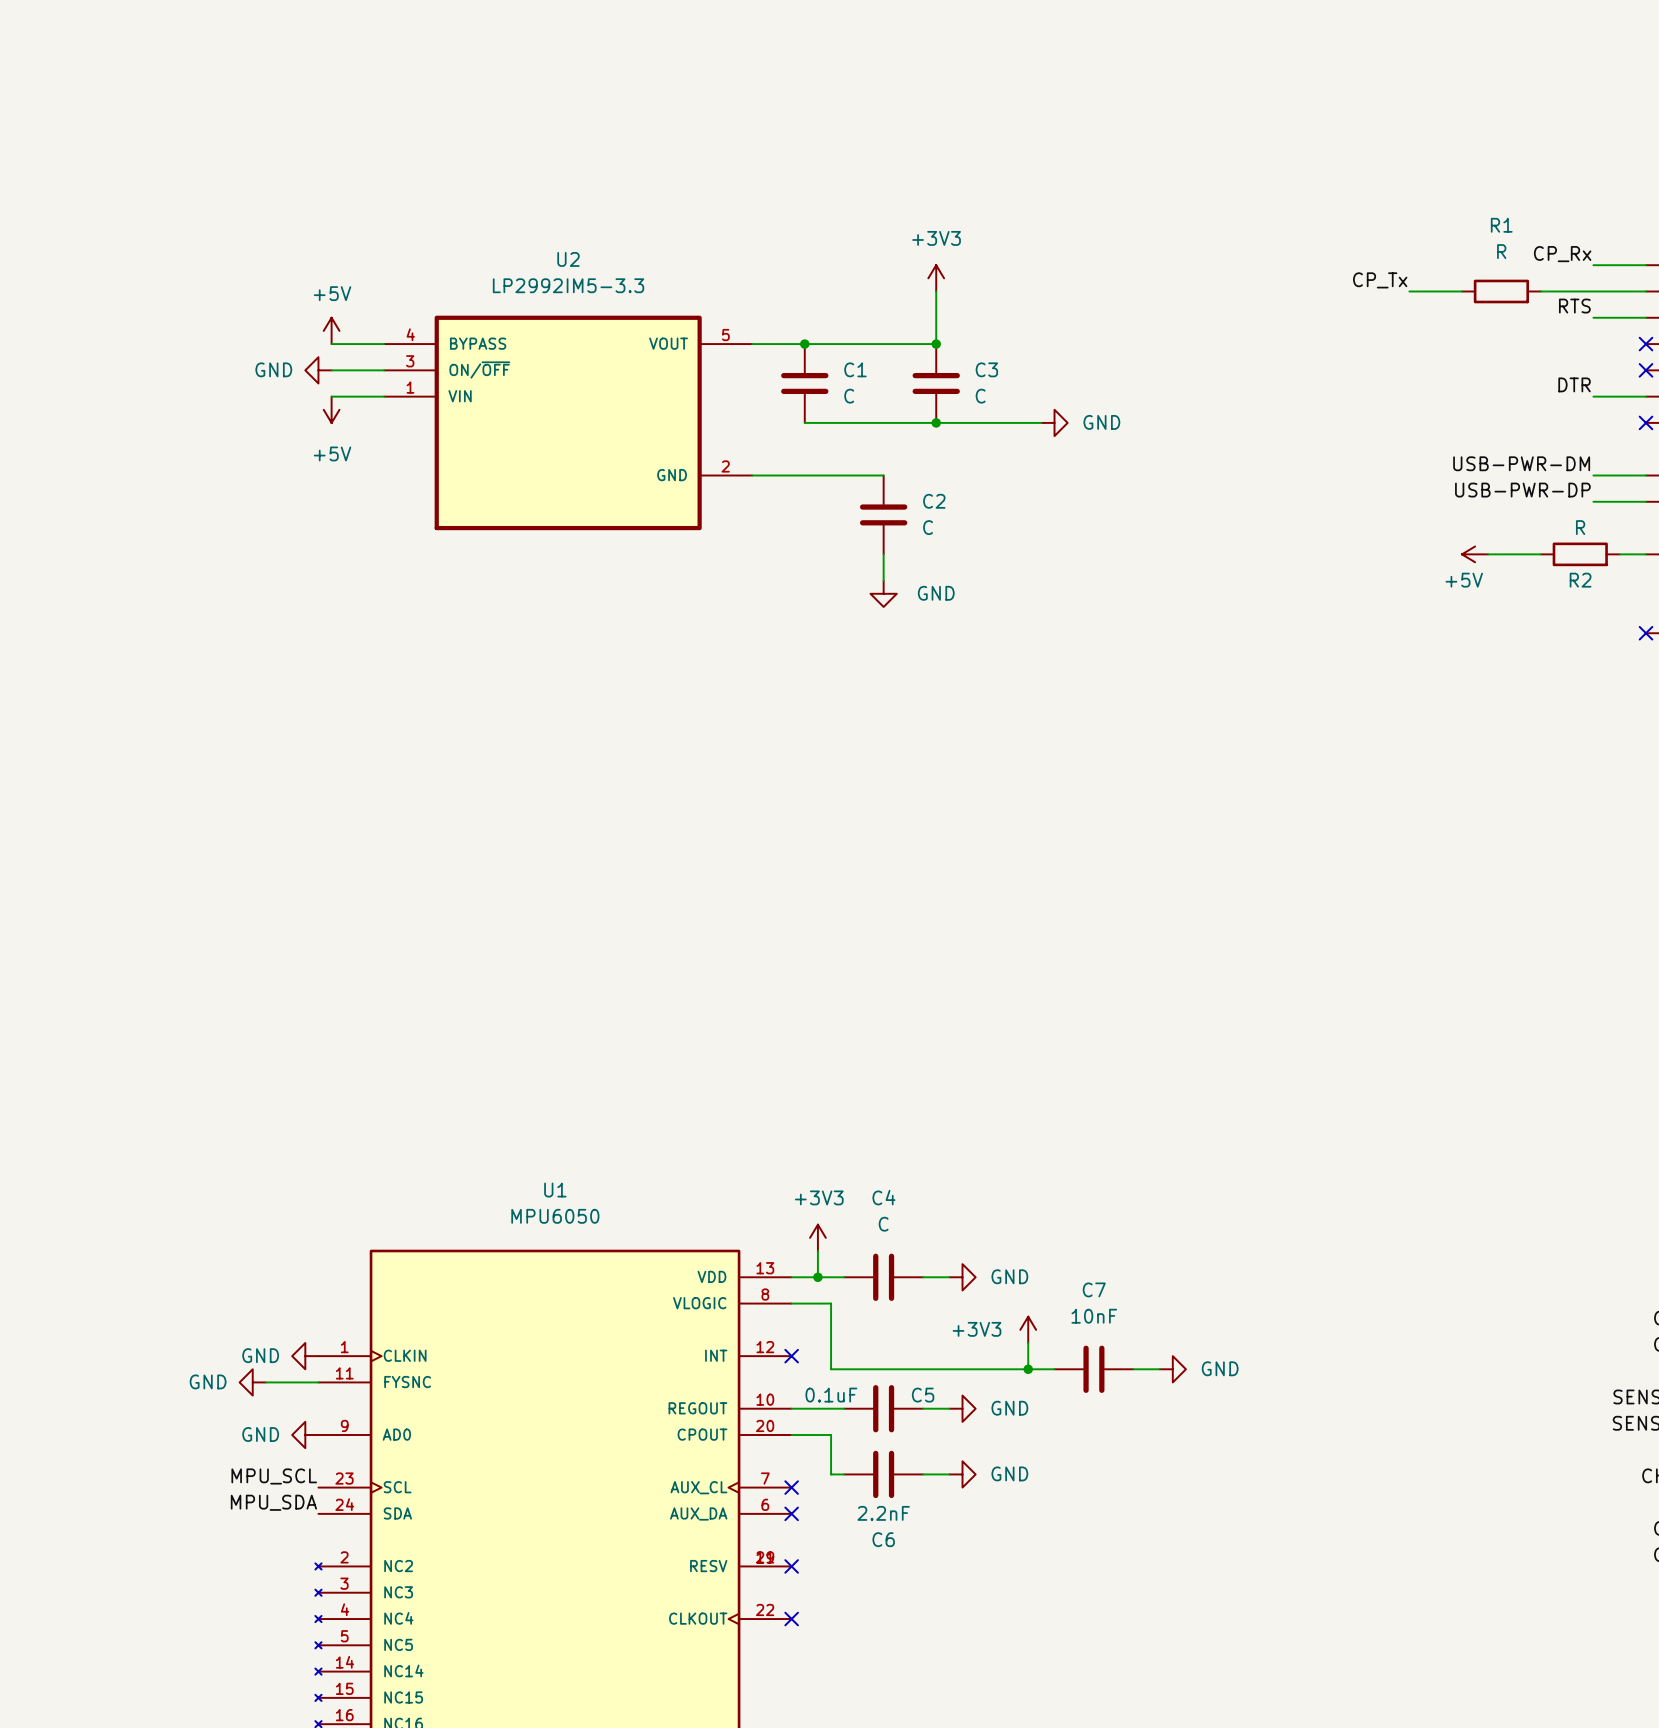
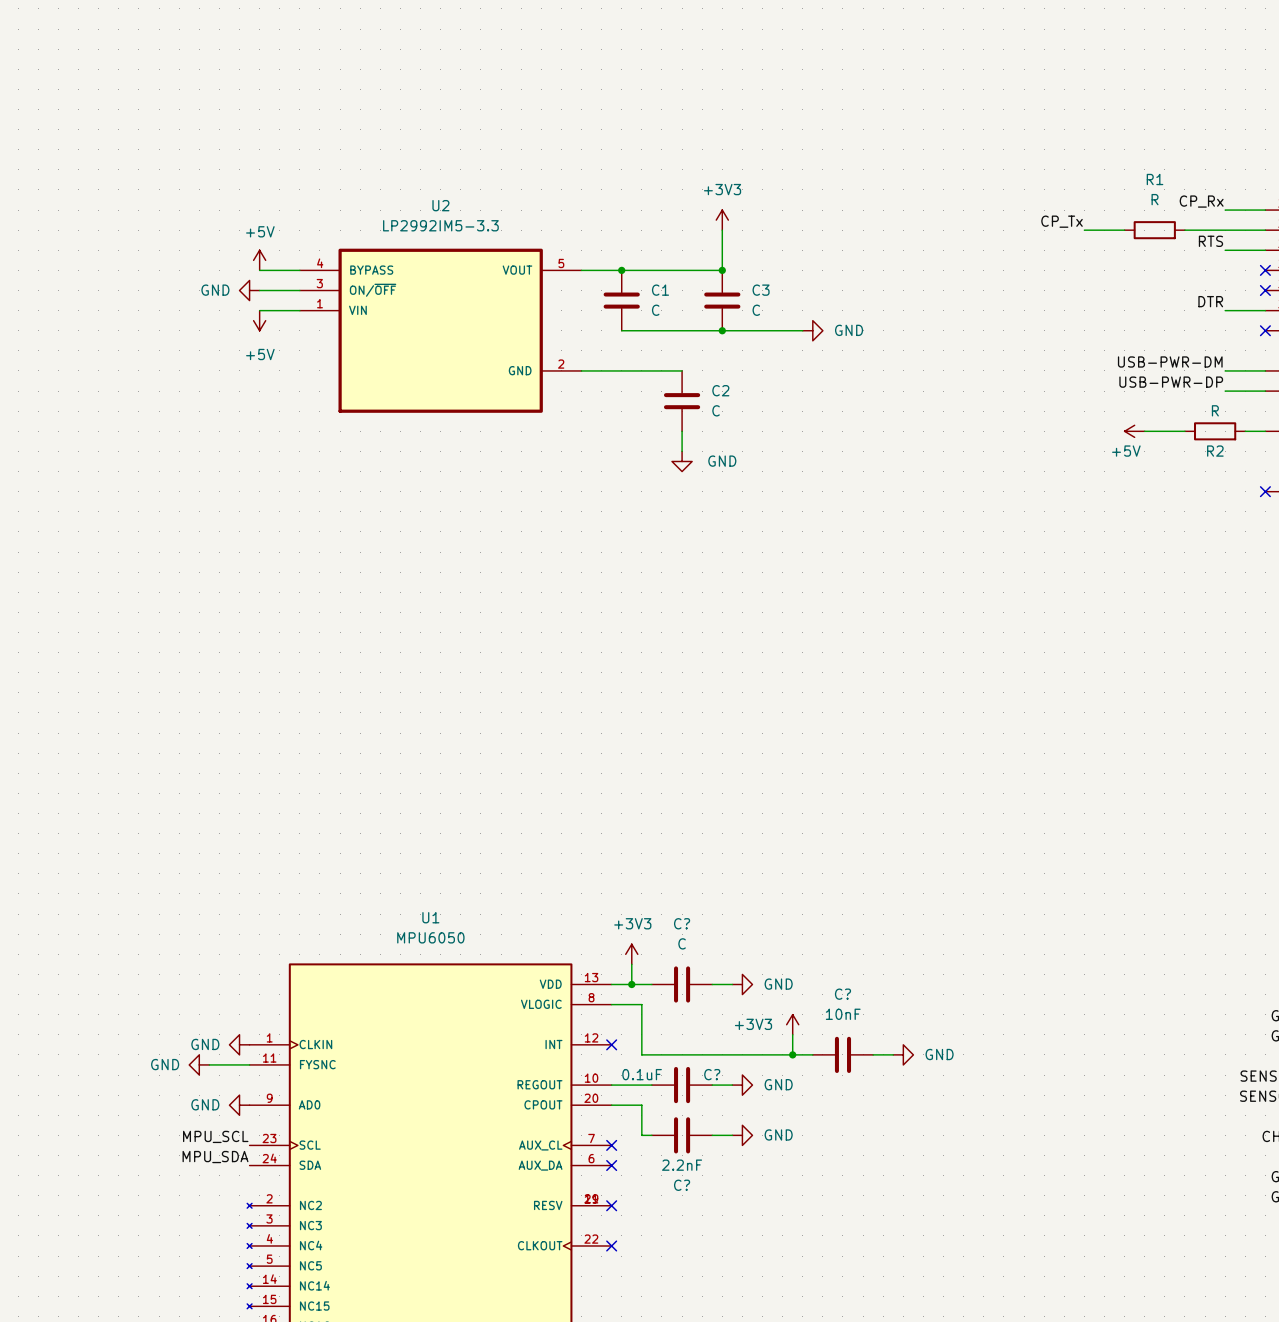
C4 name: C4 (883, 1197) -> C? (682, 923)
C7 name: C7 (1094, 1289) -> C? (842, 994)
C5 name: C5 (923, 1395) -> C? (712, 1074)
C6 name: C6 (883, 1539) -> C? (682, 1185)

